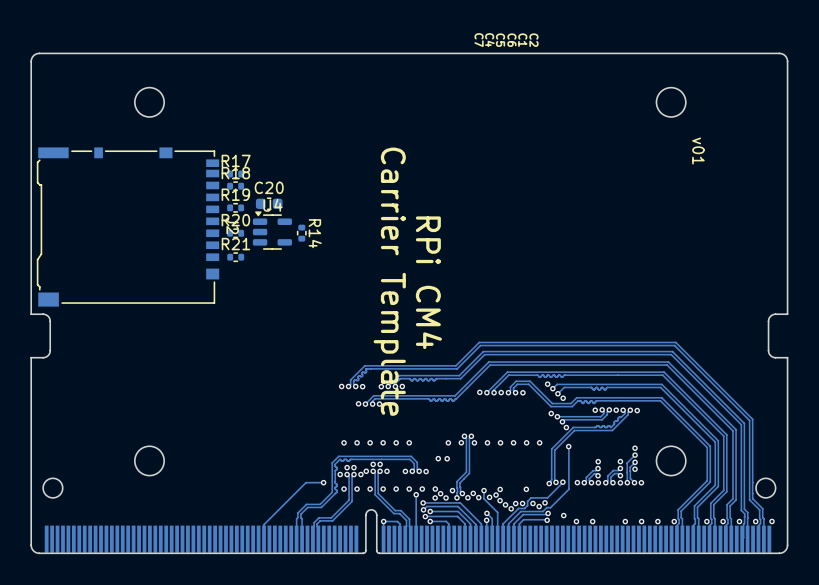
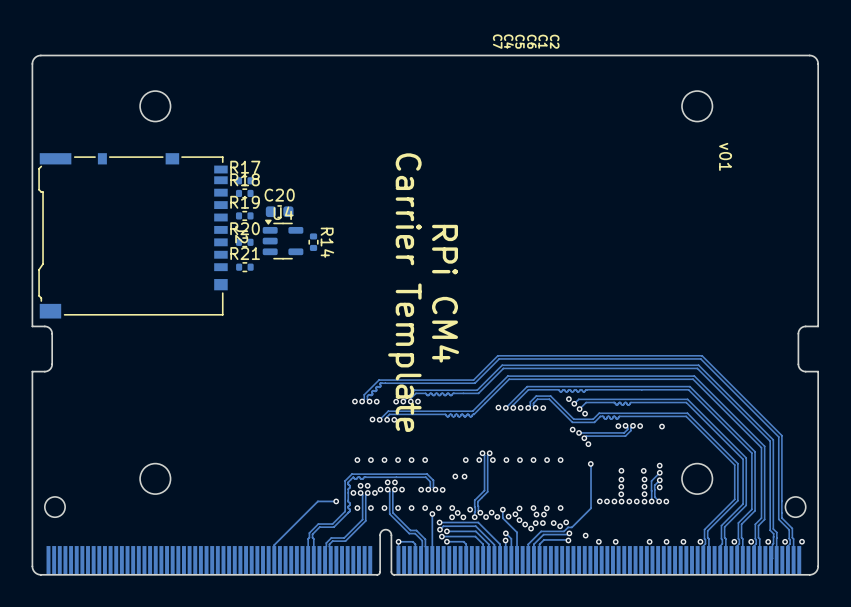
track: (623, 410) (625, 413) (614, 422) (611, 427) (598, 425) (573, 427) (551, 449) (551, 479) (549, 483) -> none
via: (623, 410) -> none
track: (630, 410) (612, 430) (574, 430) (554, 450) (556, 482) -> none
via: (630, 410) -> none
via: none -> (621, 470)
via: none -> (643, 470)
track: (598, 468) (586, 477) (584, 482) -> none
track: (620, 468) (613, 470) (607, 476) (605, 482) -> none
track: (598, 475) (594, 473) (589, 478) (591, 482) -> none
track: (620, 475) (614, 473) (610, 477) (612, 482) -> none
via: (556, 482) -> none
track: (562, 482) (547, 497) (531, 497) (524, 508) (518, 508) (503, 523) (503, 539) -> none
via: (562, 482) -> none
via: (549, 483) -> none
via: none -> (533, 508)
via: none -> (560, 508)
via: none -> (536, 514)
via: none -> (543, 514)

